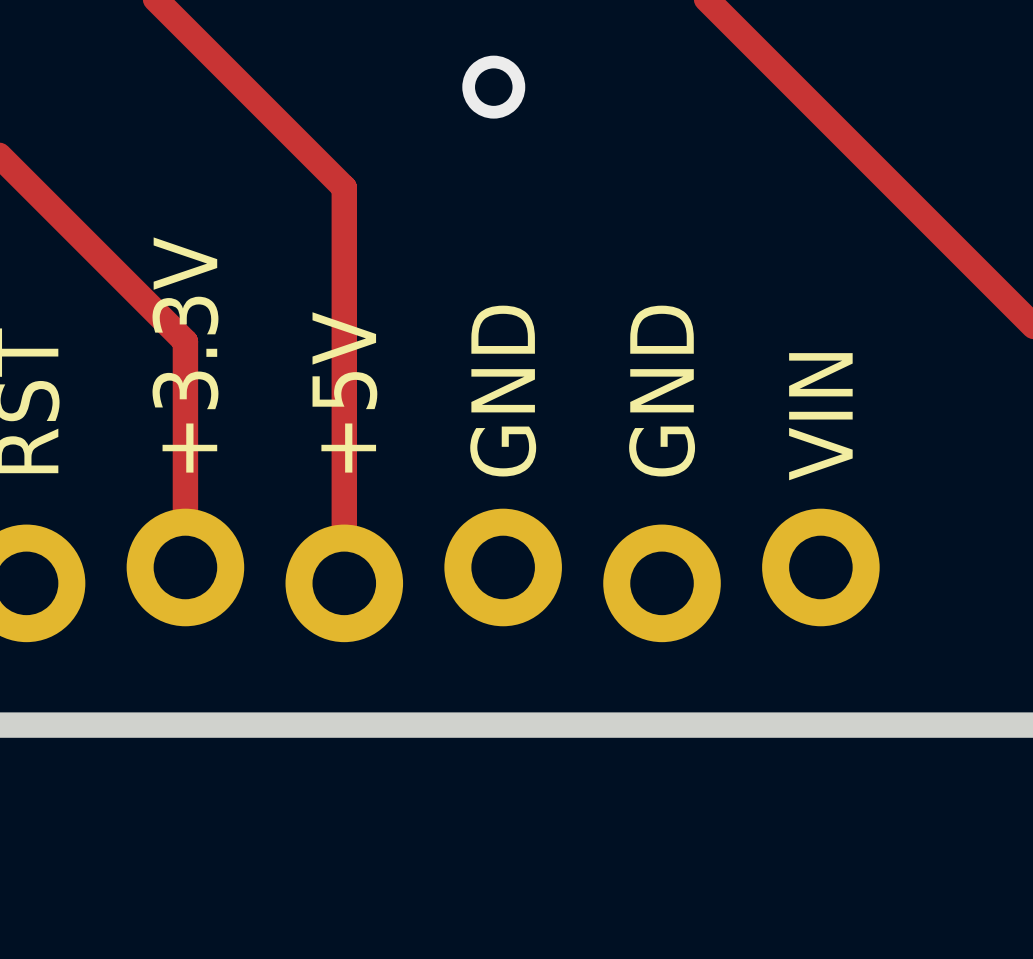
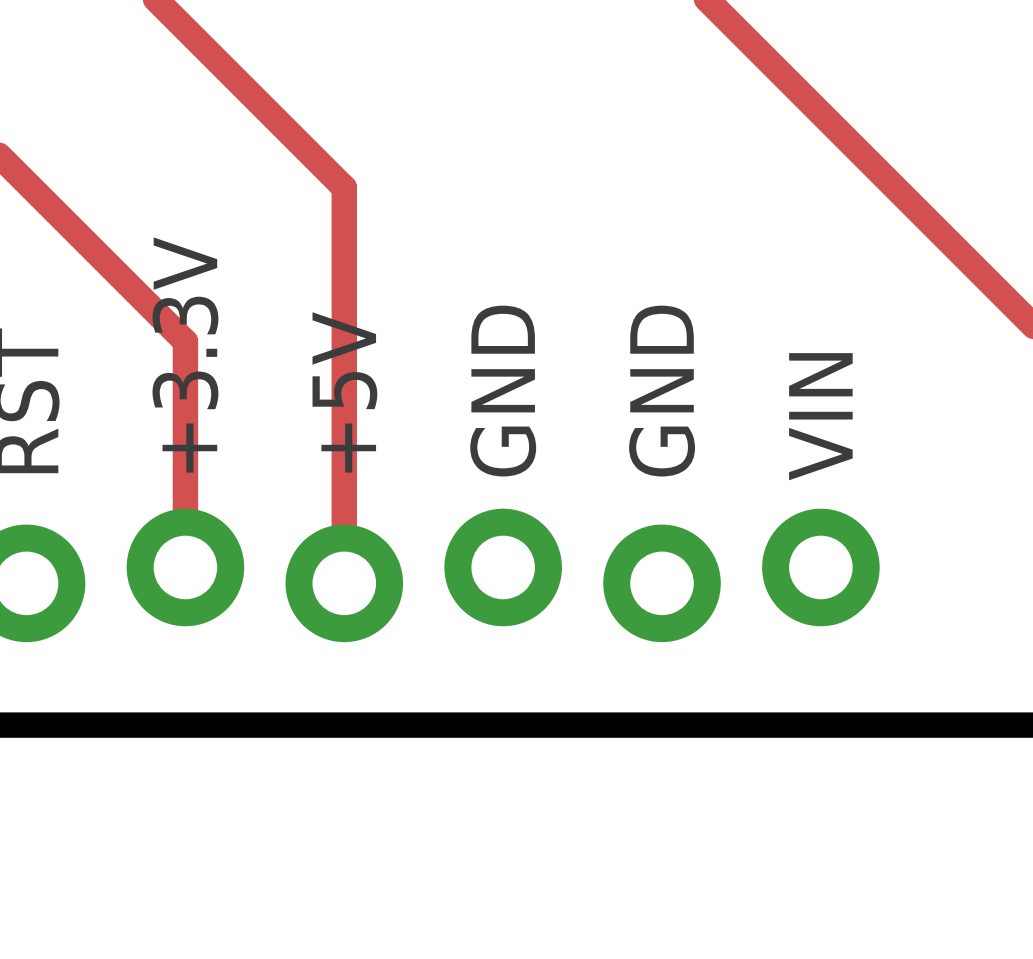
via: (493, 87) -> none

